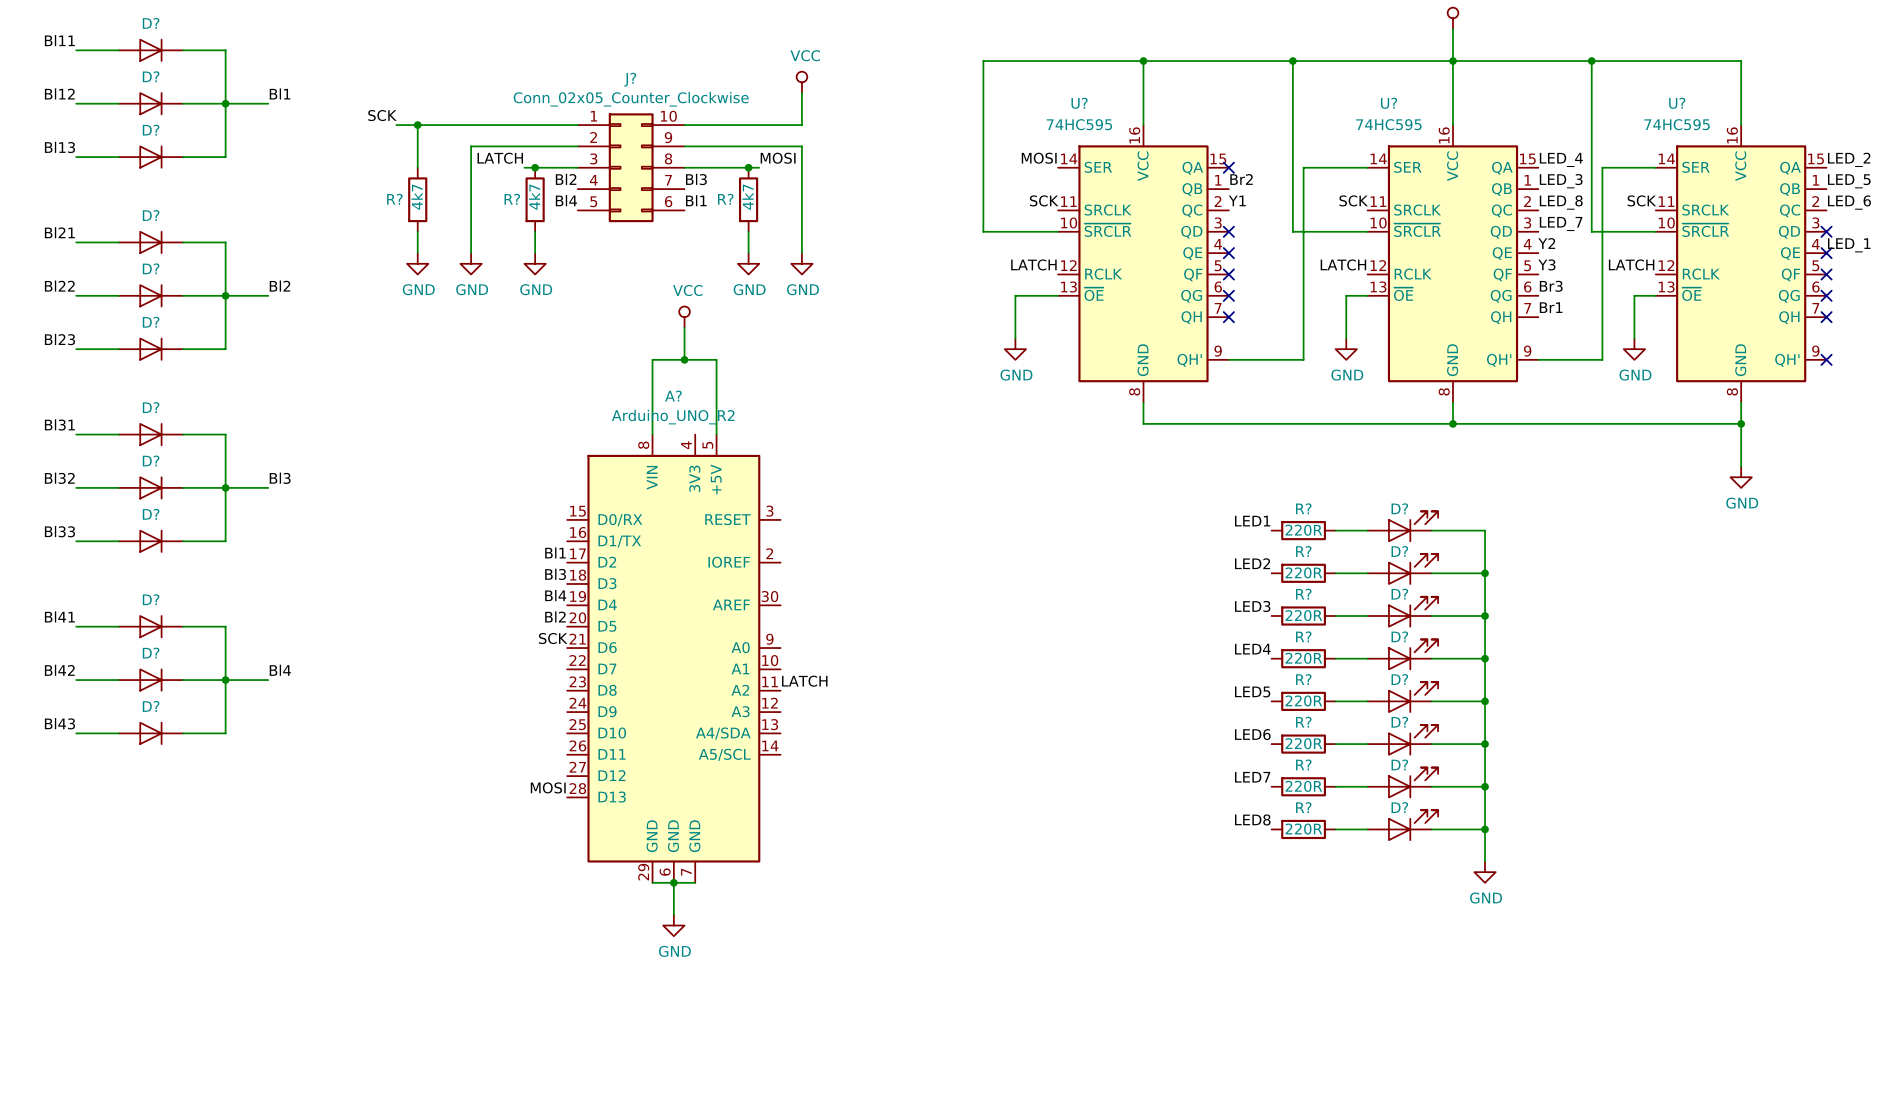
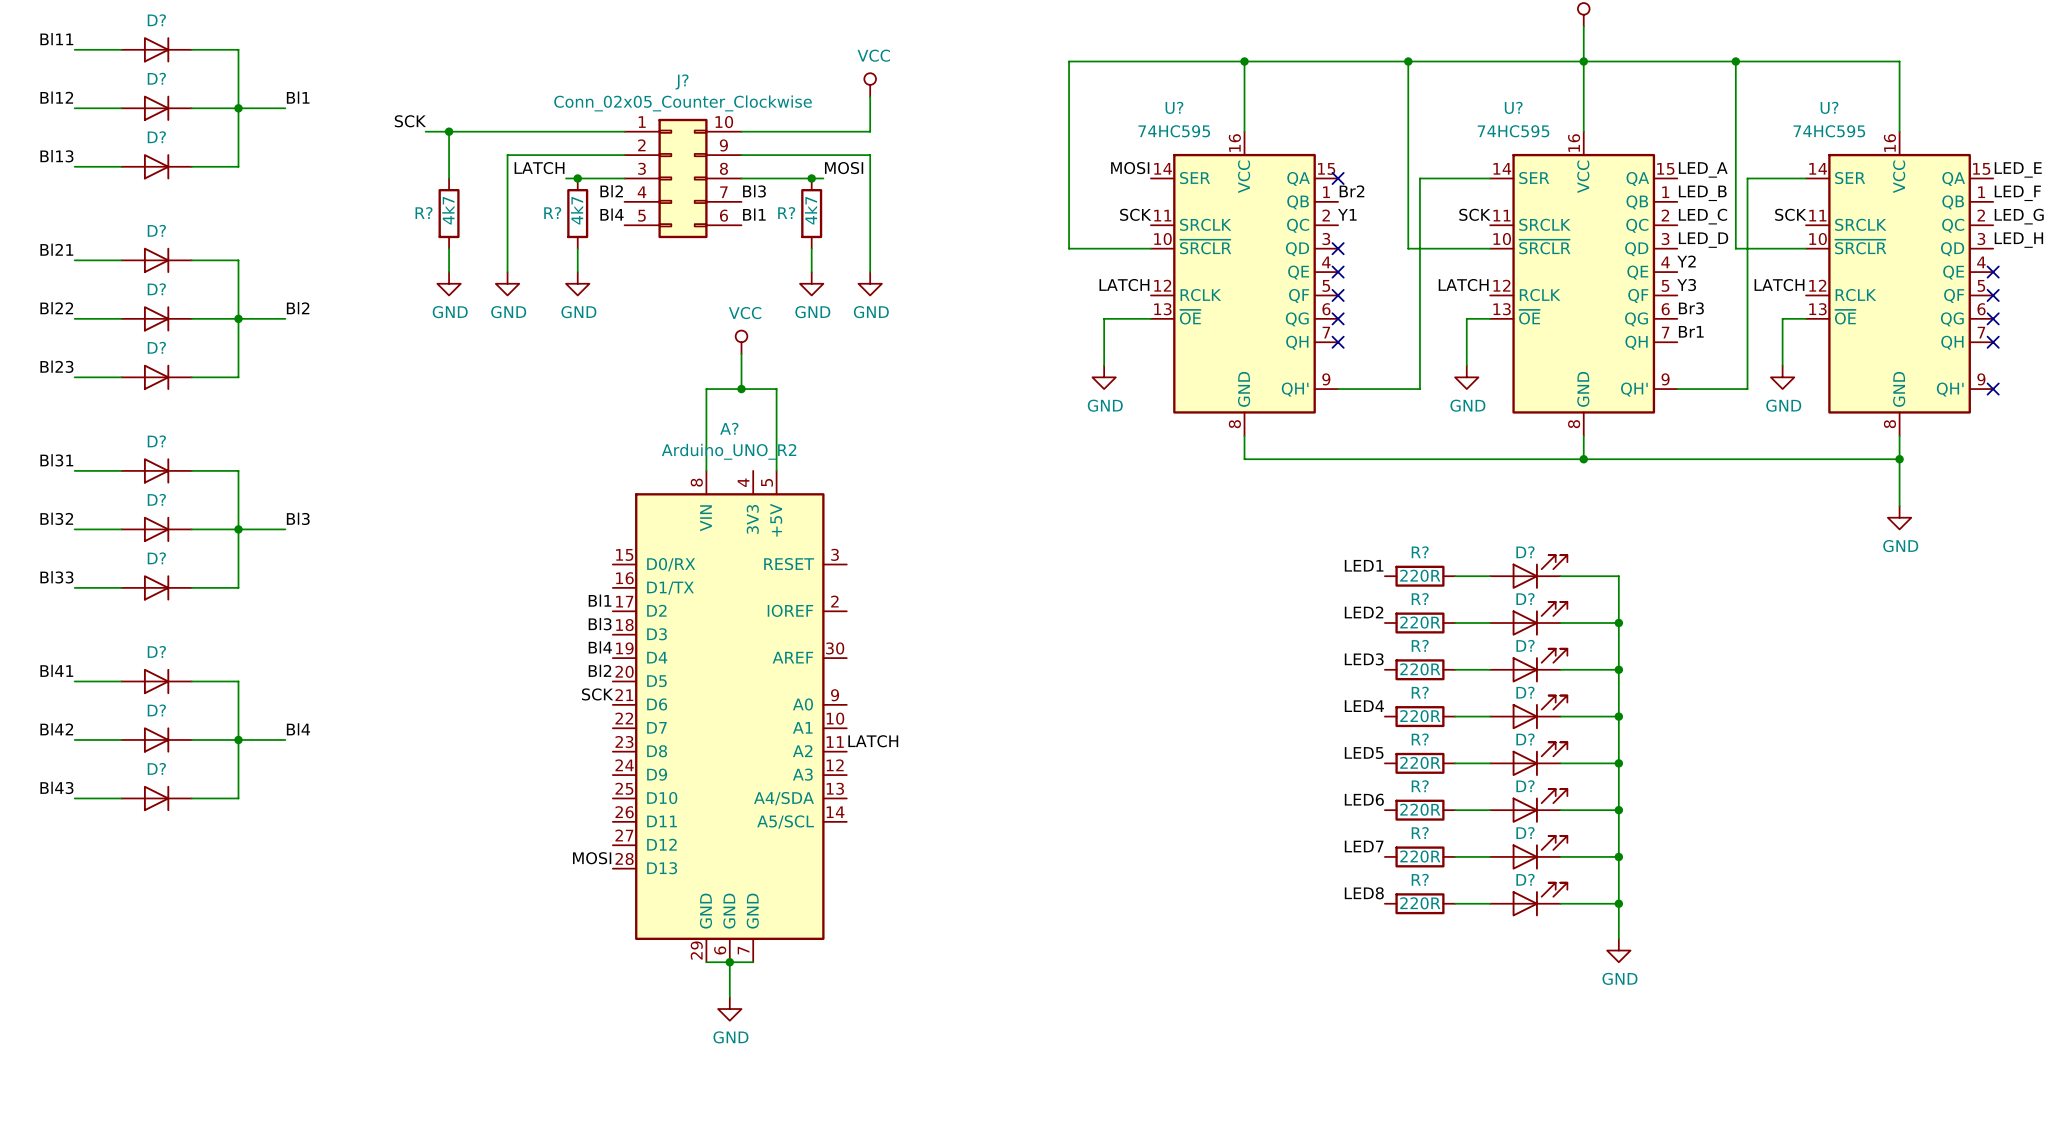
label: LED_4 (1561, 159) -> LED_A (1703, 169)
label: LED_2 (1849, 159) -> LED_E (2018, 169)
label: LED_3 (1561, 181) -> LED_B (1702, 193)
label: LED_5 (1849, 181) -> LED_F (2017, 193)
label: LED_8 (1561, 202) -> LED_C (1703, 216)
label: LED_6 (1849, 202) -> LED_G (2019, 216)
label: LED_7 (1561, 223) -> LED_D (1703, 240)
no-connect mark: (1826, 231) -> none
label: LED_1 (1849, 245) -> LED_H (2018, 240)

